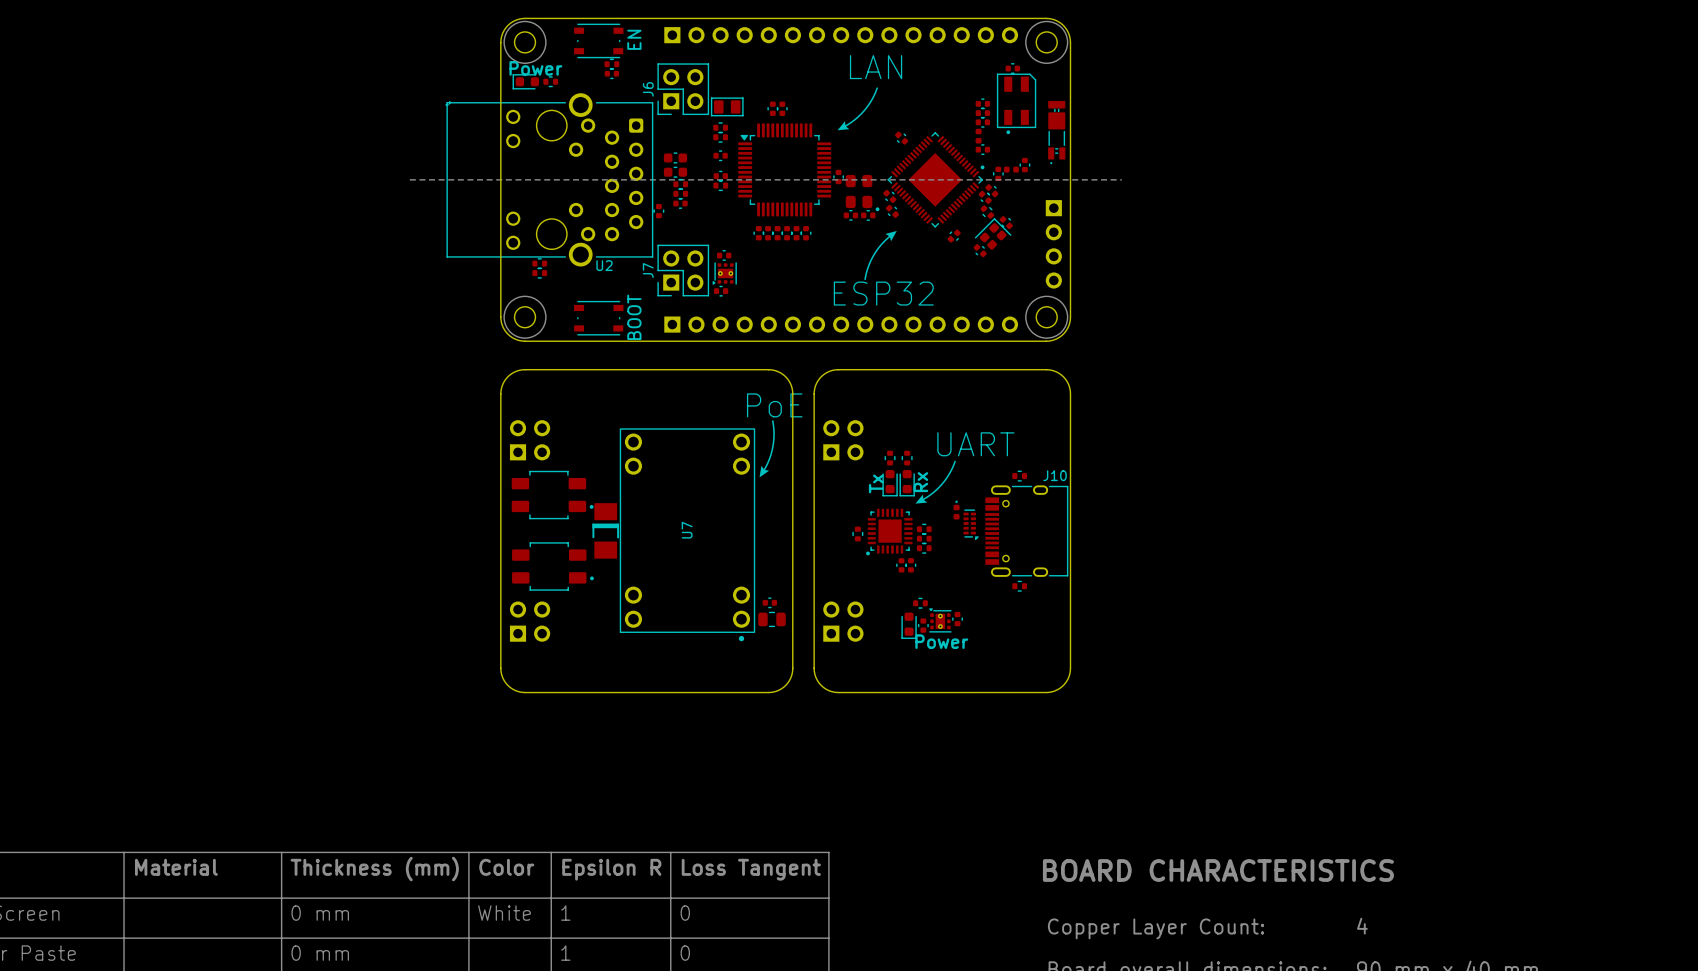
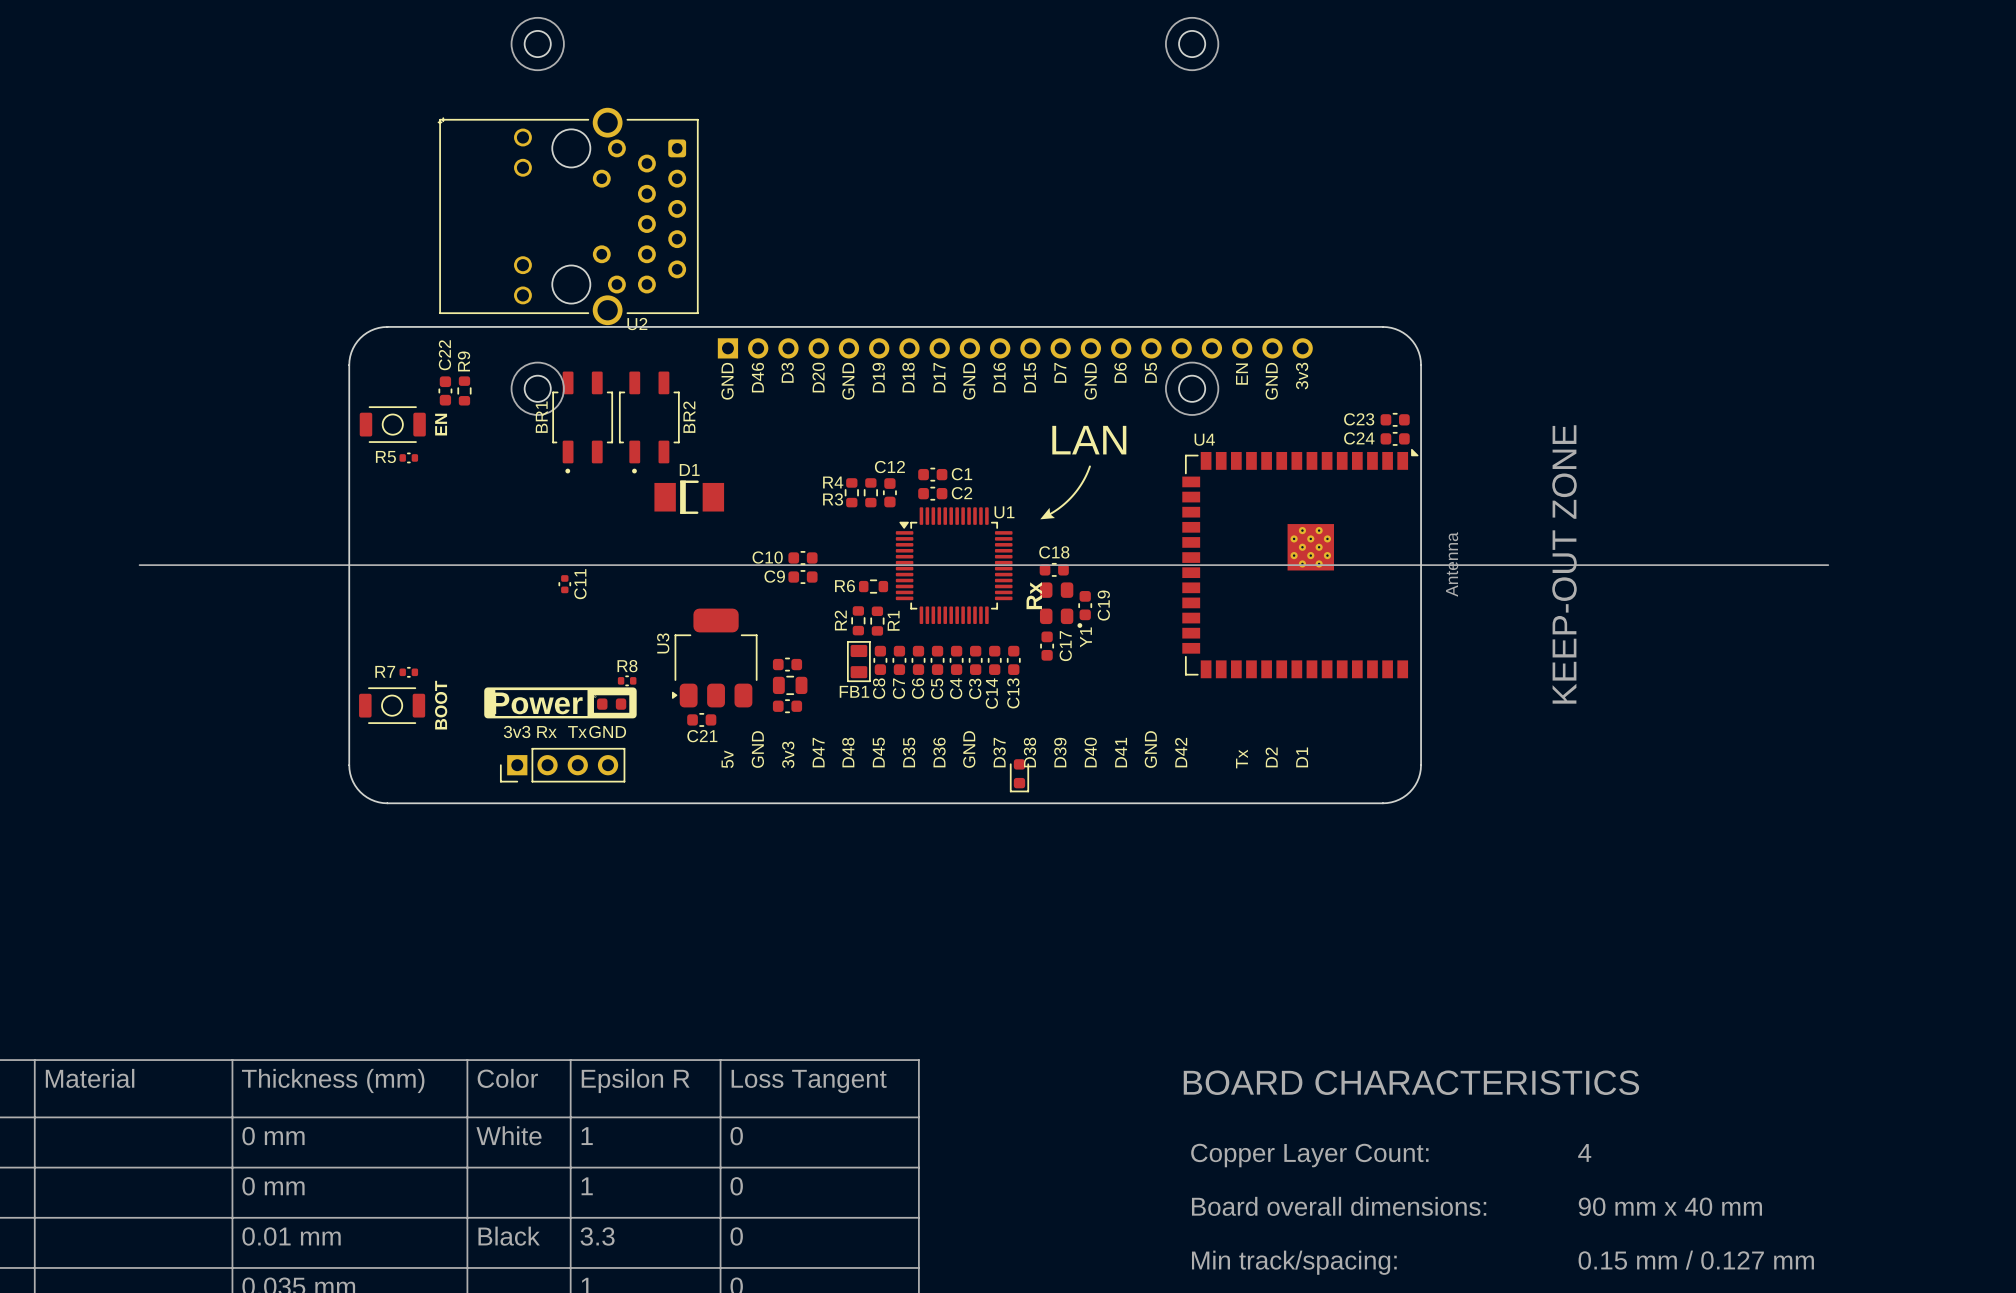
board edge: (525, 18) (1046, 18) (1058, 21) (1067, 30) (1070, 42) (1070, 317) (1066, 329) (1059, 337) (1046, 341) (525, 341) (512, 337) (503, 327) (500, 317) (500, 42) (502, 33) (507, 25) (515, 20) (525, 18) -> none
part: (841, 35) -> none
text: EN (634, 39) -> none
part: (598, 40) -> none
part: (611, 64) -> none
text: LAN (876, 67) -> none
text: Power (535, 68) -> none
part: (1012, 68) -> none
part: (611, 73) -> none
part: (525, 81) -> none
part: (550, 81) -> none
drawing: [837, 87, 878, 131] -> none
J6: (683, 89) -> none
part: (982, 103) -> none
part: (1016, 103) -> none
part: (727, 106) -> none
part: (772, 108) -> none
part: (782, 108) -> none
part: (982, 113) -> none
part: (982, 122) -> none
part: (720, 127) -> none
part: (1056, 132) -> none
part: (978, 136) -> none
part: (720, 137) -> none
part: (901, 138) -> none
part: (982, 149) -> none
part: (720, 155) -> none
part: (675, 157) -> none
part: (1024, 165) -> none
part: (784, 169) -> none
part: (1011, 169) -> none
part: (675, 172) -> none
part: (998, 173) -> none
part: (720, 176) -> none
part: (838, 176) -> none
line: (409, 179) (1121, 179) -> none
part: (936, 179) -> none
part: (680, 184) -> none
part: (720, 185) -> none
part: (991, 190) -> none
part: (680, 193) -> none
part: (862, 193) -> none
part: (889, 196) -> none
part: (985, 197) -> none
part: (680, 203) -> none
part: (658, 211) -> none
part: (892, 211) -> none
part: (987, 212) -> none
part: (850, 215) -> none
part: (868, 215) -> none
part: (1006, 222) -> none
drawing: [864, 230, 897, 281] -> none
part: (758, 233) -> none
part: (768, 233) -> none
part: (777, 233) -> none
part: (787, 233) -> none
part: (796, 233) -> none
part: (806, 233) -> none
part: (993, 234) -> none
part: (954, 236) -> none
part: (1053, 244) -> none
part: (980, 250) -> none
part: (724, 255) -> none
part: (539, 263) -> none
board edge: none -> (387, 326) (1382, 326) (1399, 330) (1415, 344) (1421, 365) (1421, 765) (1417, 781) (1403, 797) (1382, 803) (387, 803) (370, 799) (355, 785) (349, 765) (349, 365) (353, 348) (360, 338) (370, 330) (387, 326)
J7: (683, 270) -> none
part: (539, 273) -> none
part: (724, 273) -> none
part: none -> (1015, 348)
part: (721, 291) -> none
text: ESP32 (883, 293) -> none
text: none -> D3 (787, 372)
text: none -> D7 (1060, 372)
text: none -> D6 (1120, 372)
text: none -> D5 (1150, 372)
text: none -> EN (1241, 374)
text: none -> 3v3 (1302, 376)
text: none -> D46 (757, 377)
text: none -> D20 (818, 377)
text: none -> D19 (878, 377)
text: none -> D18 (908, 377)
text: none -> D17 (939, 377)
text: none -> D16 (999, 377)
text: none -> D15 (1030, 377)
text: none -> GND (727, 381)
text: none -> GND (848, 381)
text: none -> GND (969, 381)
text: none -> GND (1090, 381)
text: none -> GND (1271, 381)
text: BOOT (634, 317) -> none
C22: none -> (445, 390)
R9: none -> (464, 390)
part: (598, 318) -> none
part: (841, 324) -> none
C23: none -> (1395, 419)
BR1: none -> (582, 422)
BR2: none -> (649, 422)
part: none -> (392, 424)
text: none -> EN (441, 424)
C24: none -> (1395, 438)
text: none -> LAN (1089, 440)
board edge: (525, 369) (768, 369) (777, 371) (787, 379) (792, 393) (792, 668) (790, 678) (783, 687) (768, 692) (525, 692) (512, 689) (505, 683) (500, 668) (500, 391) (504, 381) (509, 374) (525, 369) -> none
board edge: (838, 369) (1046, 369) (1055, 371) (1065, 379) (1070, 393) (1070, 668) (1068, 678) (1059, 688) (1046, 692) (838, 692) (829, 690) (819, 683) (814, 668) (814, 391) (821, 376) (827, 372) (838, 369) -> none
R5: none -> (408, 457)
C1: none -> (932, 474)
R4: none -> (851, 492)
R3: none -> (870, 492)
C12: none -> (889, 492)
C2: none -> (932, 493)
D1: none -> (689, 497)
text: PoE (774, 405) -> none
drawing: [759, 420, 775, 478] -> none
part: (530, 440) -> none
part: (843, 440) -> none
text: UART (975, 444) -> none
C10: none -> (802, 557)
U4: none -> (1300, 563)
line: none -> (139, 565) (1828, 565)
U1: none -> (954, 565)
part: (890, 458) -> none
part: (907, 458) -> none
C18: none -> (1054, 569)
C9: none -> (802, 577)
C11: none -> (564, 584)
R6: none -> (873, 586)
part: (1019, 476) -> none
drawing position: (935, 482) -> (1065, 492)
text: Tx (876, 483) -> none
part: (890, 483) -> none
part: (907, 483) -> none
Y1: none -> (1061, 605)
C19: none -> (1085, 605)
part: (552, 495) -> none
R2: none -> (858, 620)
R1: none -> (877, 621)
part: (956, 510) -> none
C17: none -> (1047, 646)
part: (971, 524) -> none
part: (924, 529) -> none
part: (605, 530) -> none
U3: none -> (714, 658)
J10: (1026, 531) -> none
part: (889, 532) -> none
C8: none -> (880, 660)
C7: none -> (899, 660)
C6: none -> (918, 660)
C5: none -> (937, 660)
part: (857, 533) -> none
C4: none -> (956, 660)
C3: none -> (975, 660)
C14: none -> (994, 660)
C13: none -> (1013, 660)
U7: (687, 534) -> none
FB1: none -> (858, 661)
part: none -> (787, 664)
part: (924, 538) -> none
R7: none -> (408, 672)
part: (924, 548) -> none
R8: none -> (627, 680)
drawing: none -> [484, 687, 637, 719]
part: (901, 565) -> none
part: (910, 565) -> none
part: (552, 566) -> none
text: none -> Power (537, 703)
part: none -> (610, 702)
part: none -> (392, 705)
text: none -> BOOT (441, 705)
part: none -> (787, 706)
C21: none -> (701, 719)
part: (1019, 586) -> none
text: none -> 3v3 (517, 731)
text: none -> Rx (546, 731)
text: none -> Tx (577, 731)
text: none -> GND (607, 731)
part: (769, 602) -> none
part: (920, 603) -> none
text: none -> GND (757, 749)
text: none -> GND (969, 749)
text: none -> GND (1150, 749)
text: none -> D47 (818, 752)
text: none -> D48 (848, 752)
text: none -> D45 (878, 752)
text: none -> D35 (909, 752)
text: none -> D36 (939, 752)
text: none -> D37 (999, 752)
text: none -> D38 (1029, 752)
text: none -> D39 (1060, 752)
text: none -> D40 (1090, 752)
text: none -> D41 (1121, 752)
text: none -> D42 (1181, 752)
text: none -> 3v3 (788, 754)
text: none -> D2 (1271, 757)
text: none -> D1 (1302, 757)
text: none -> 5v (727, 759)
text: none -> Tx (1241, 759)
part: none -> (562, 765)
part position: (771, 619) -> (790, 685)
part: (957, 619) -> none
part: (940, 620) -> none
part: (530, 621) -> none
part: (843, 621) -> none
part: (923, 625) -> none
text: Power (941, 641) -> none

